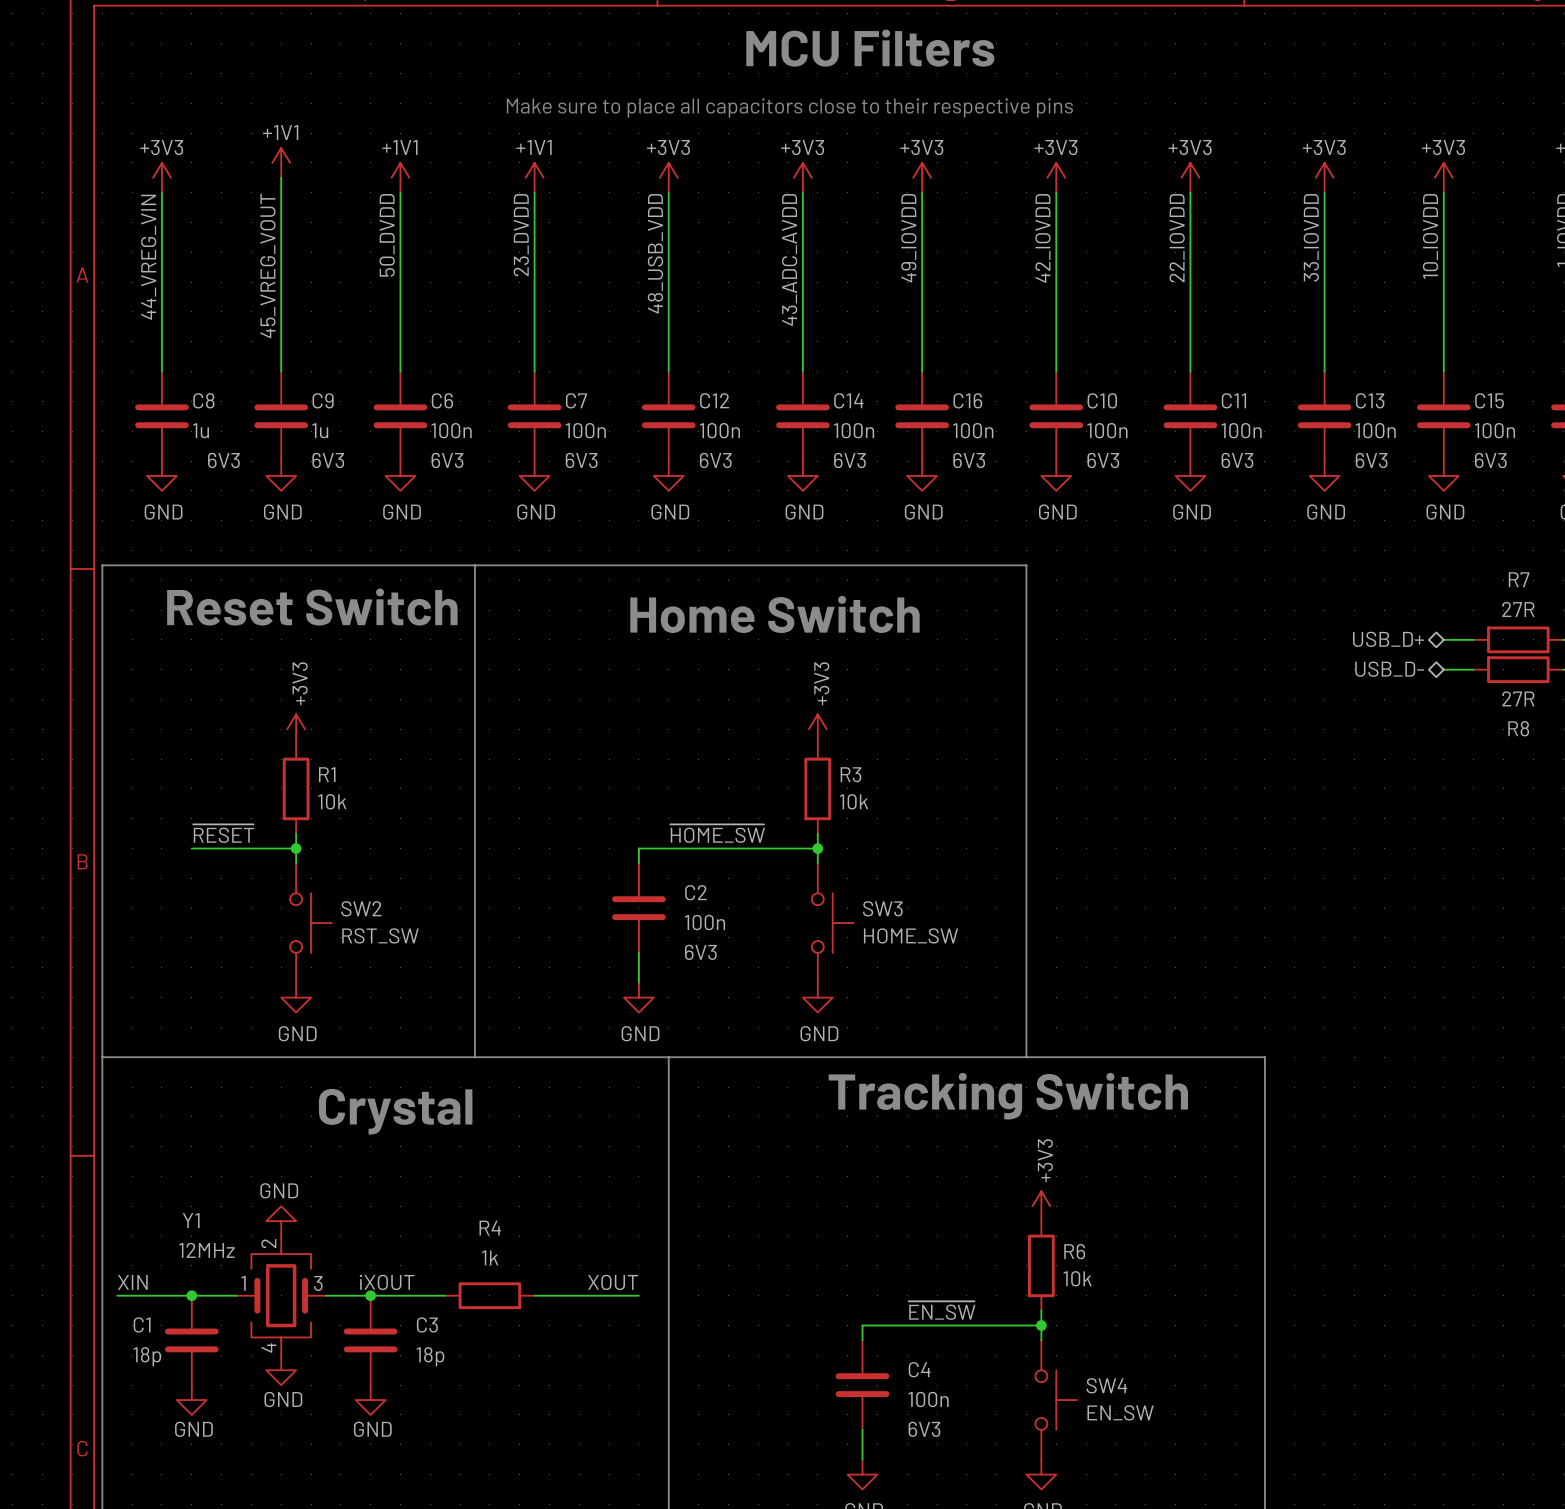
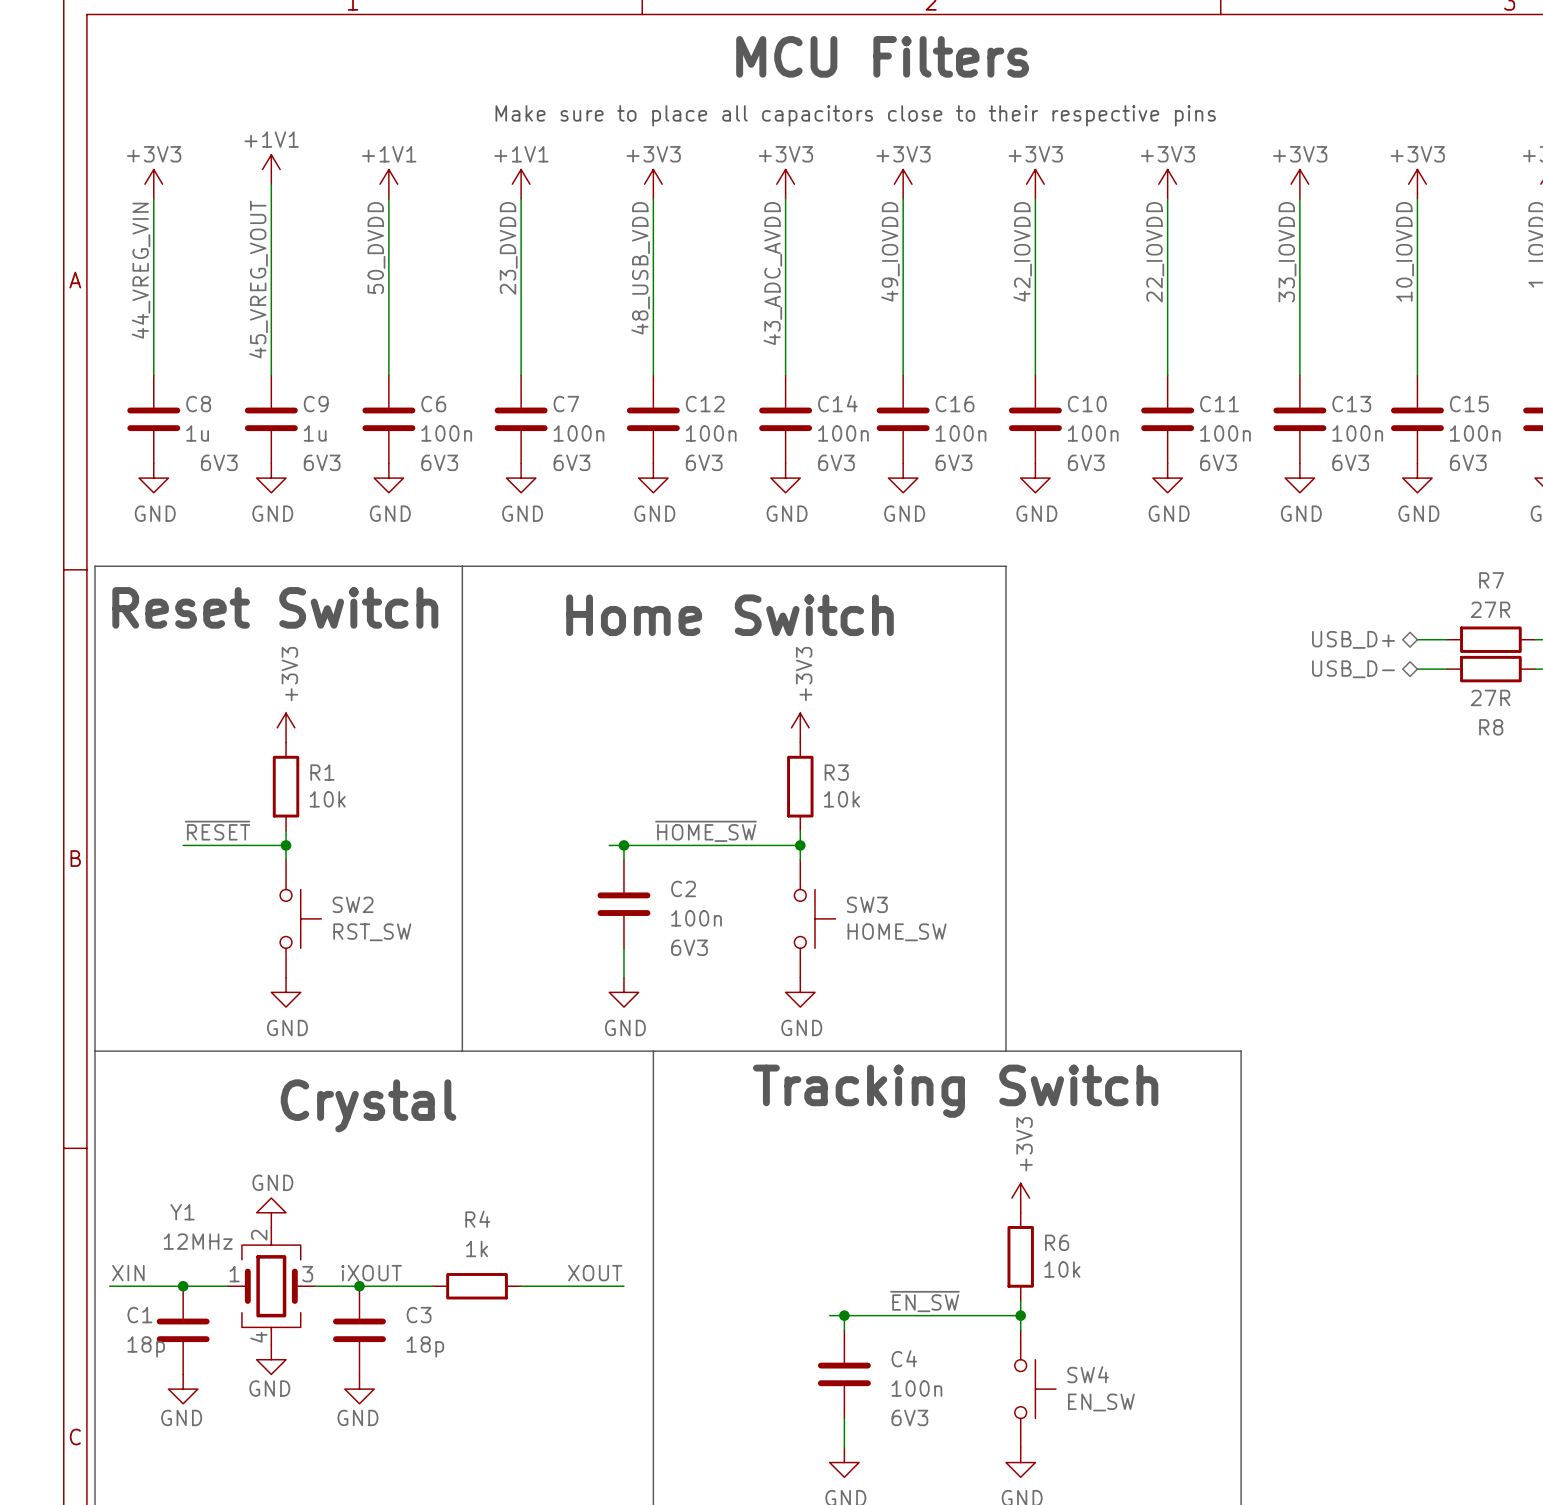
wire: none -> (609, 845) (623, 845)
junction: none -> (623, 845)
wire: none -> (829, 1315) (844, 1315)
junction: none -> (844, 1315)

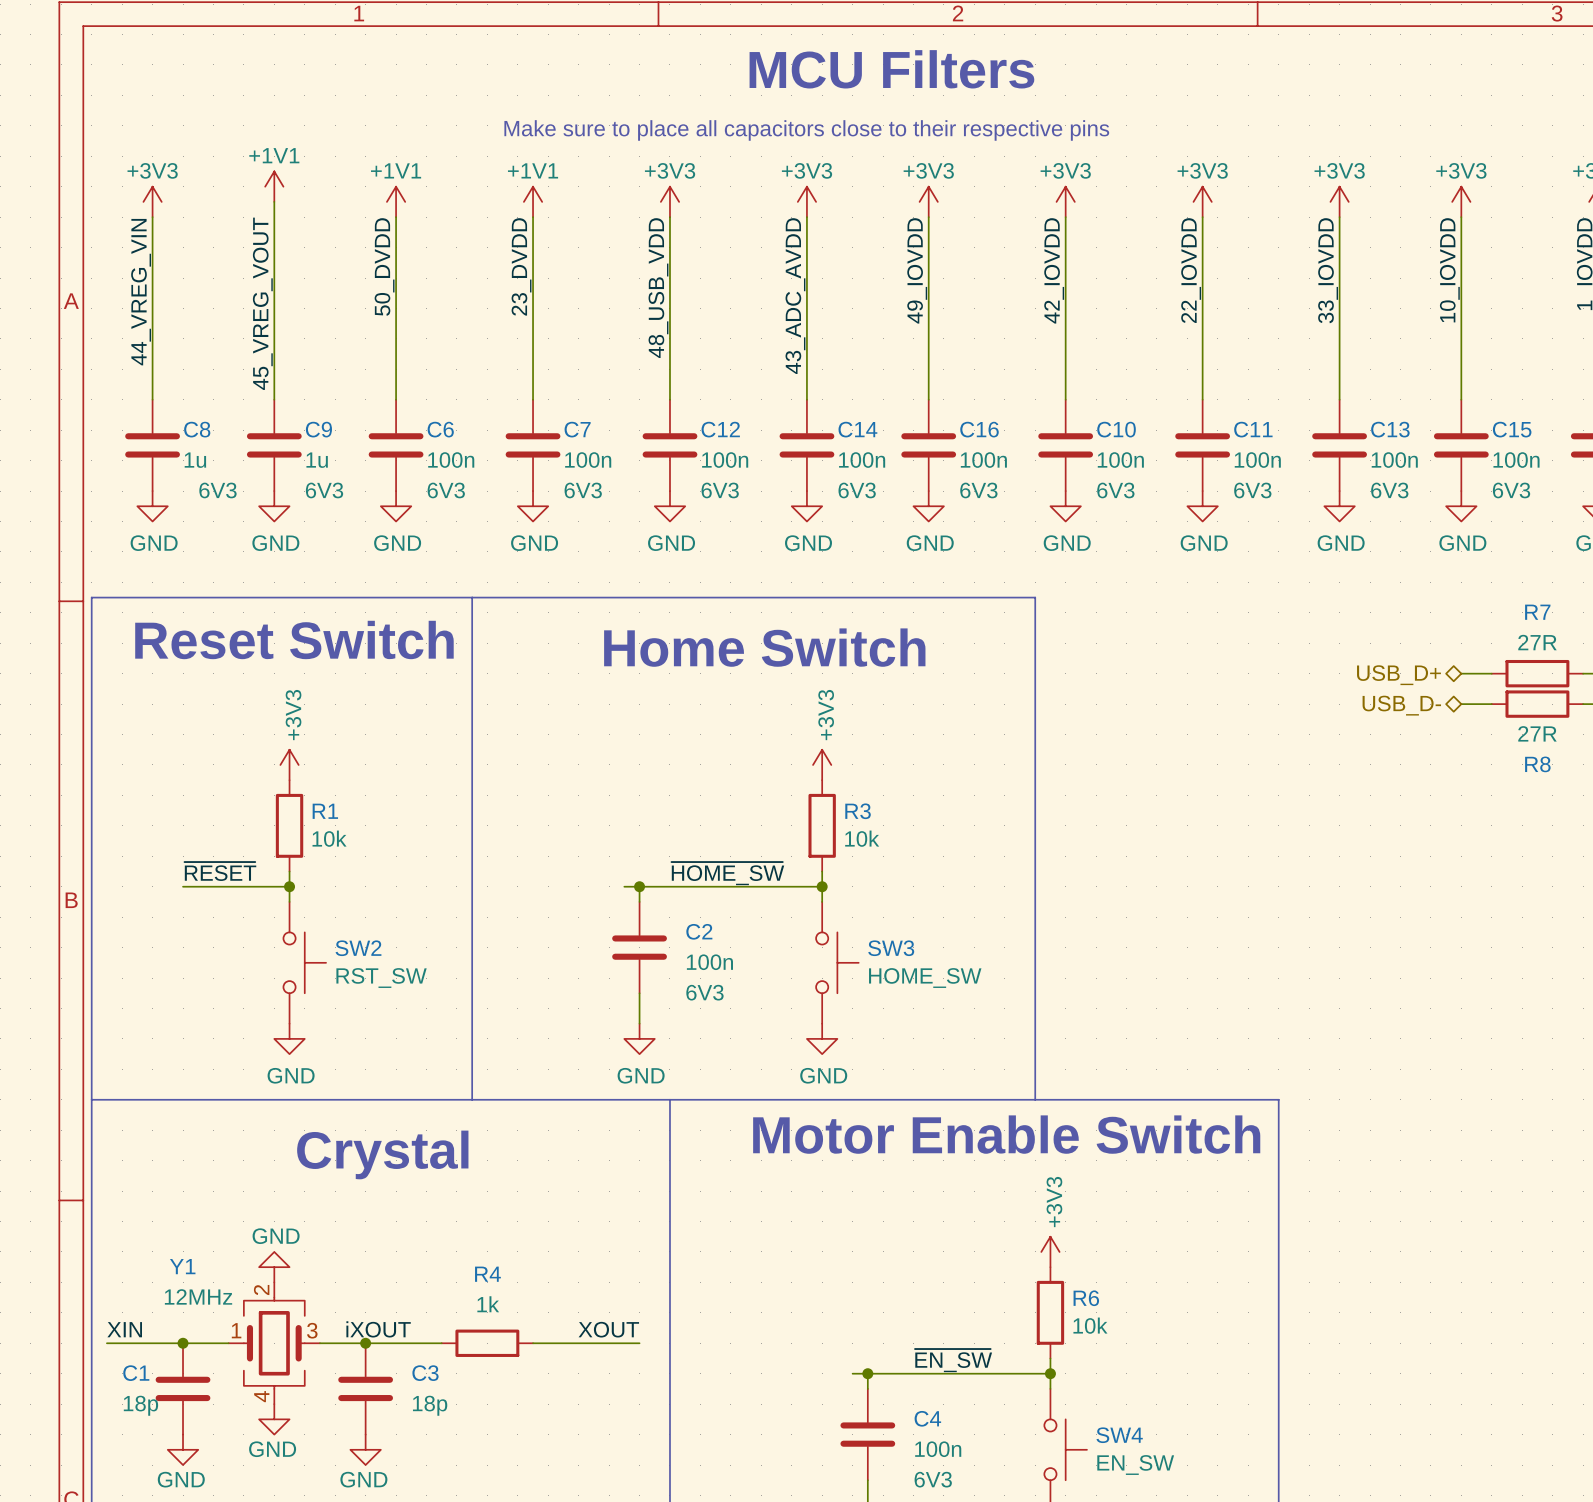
text: none -> Motor Enable Switch (1006, 1134)
text: Tracking Switch (955, 1091) -> none

